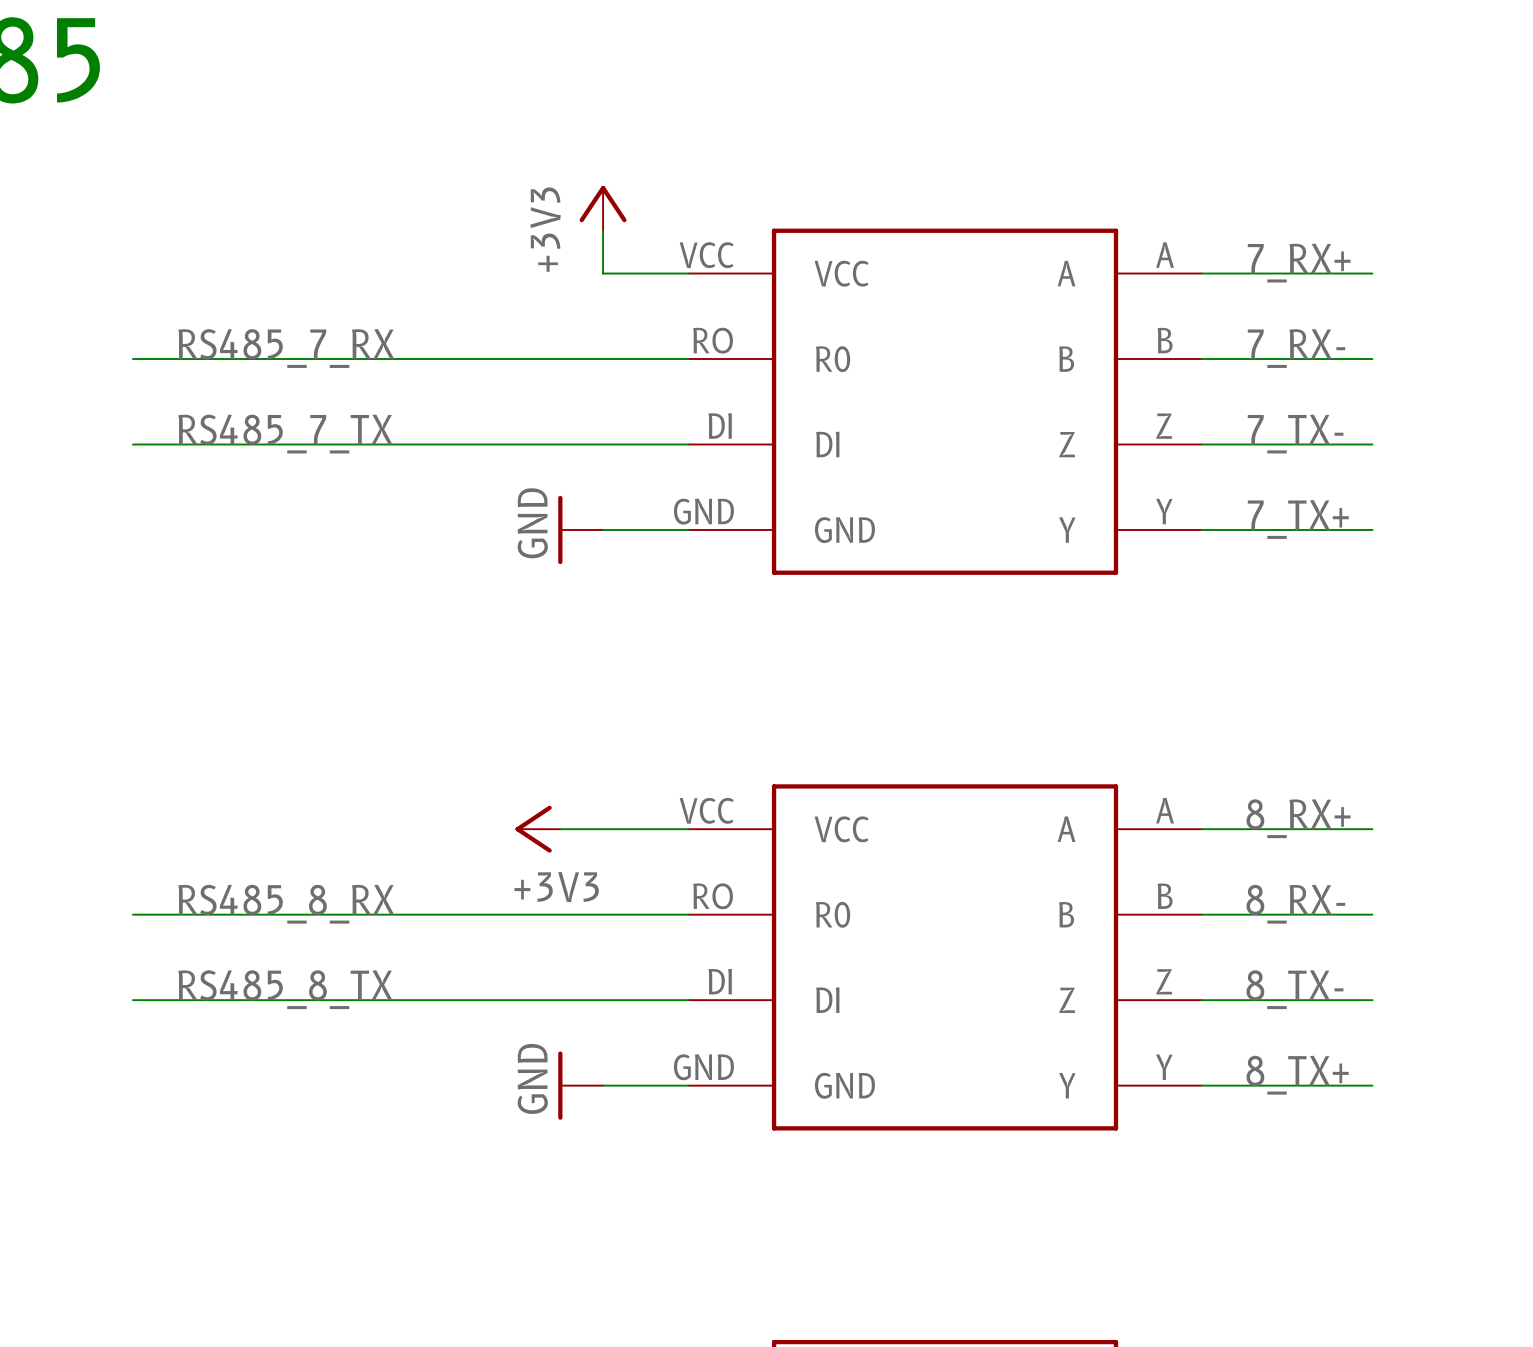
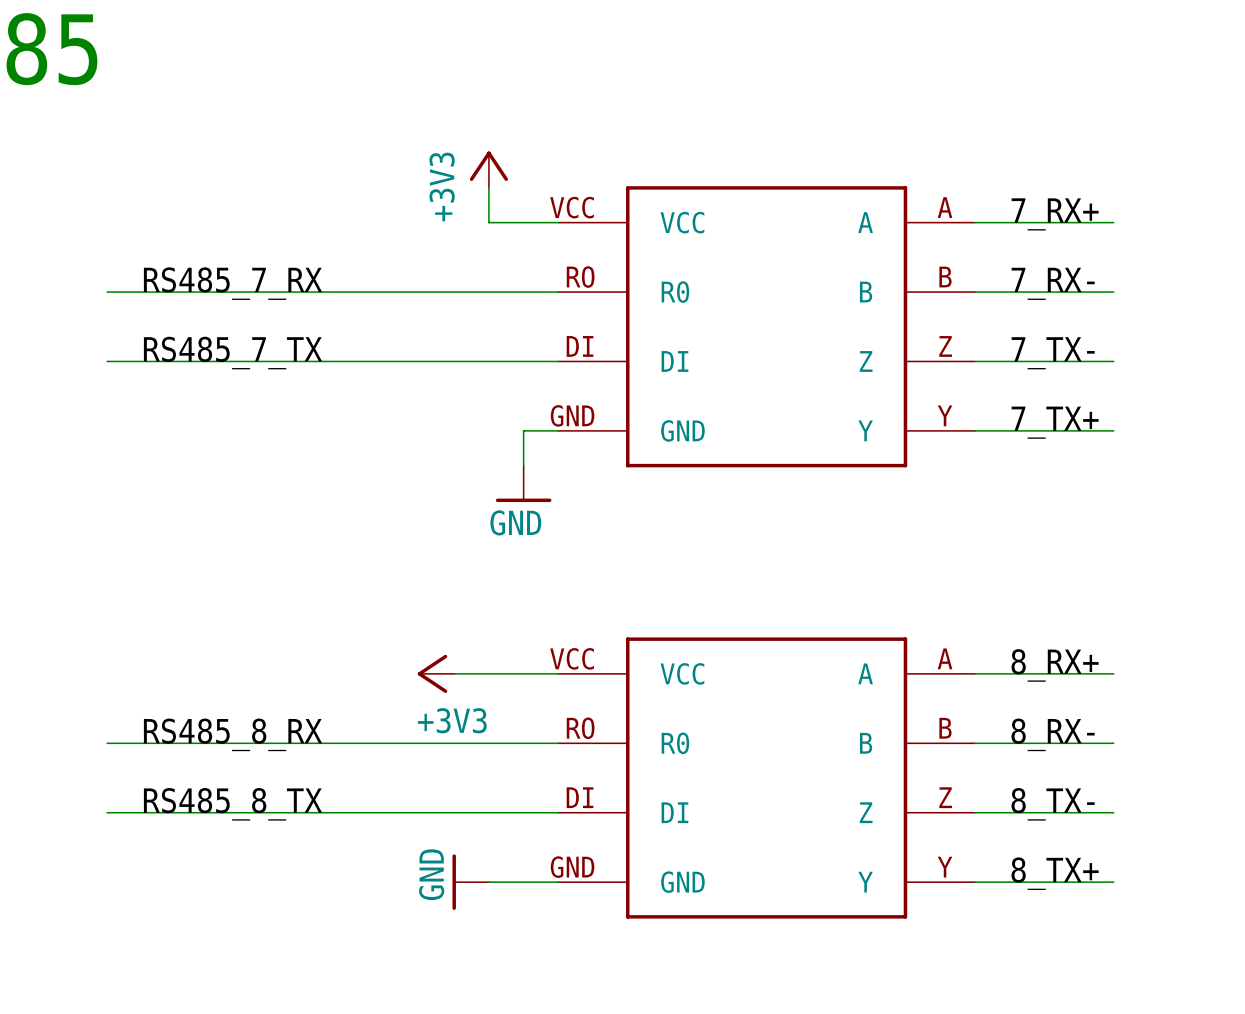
power symbol rotation: 0° (560, 529) -> 90° counterclockwise (523, 500)
power symbol position: GND (580, 529) -> GND (523, 483)
wire: (603, 529) (645, 529) -> (523, 465) (523, 430)

